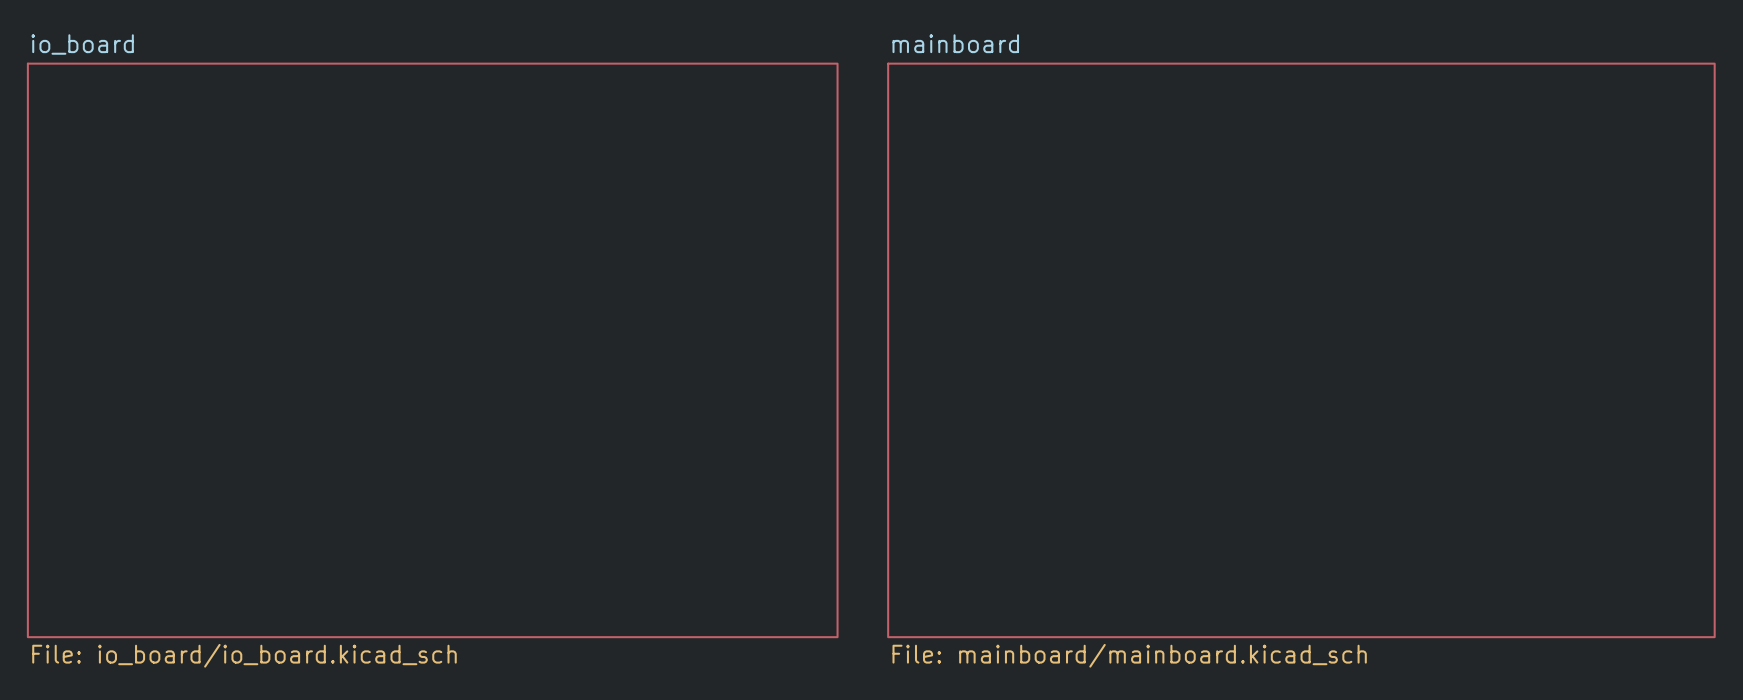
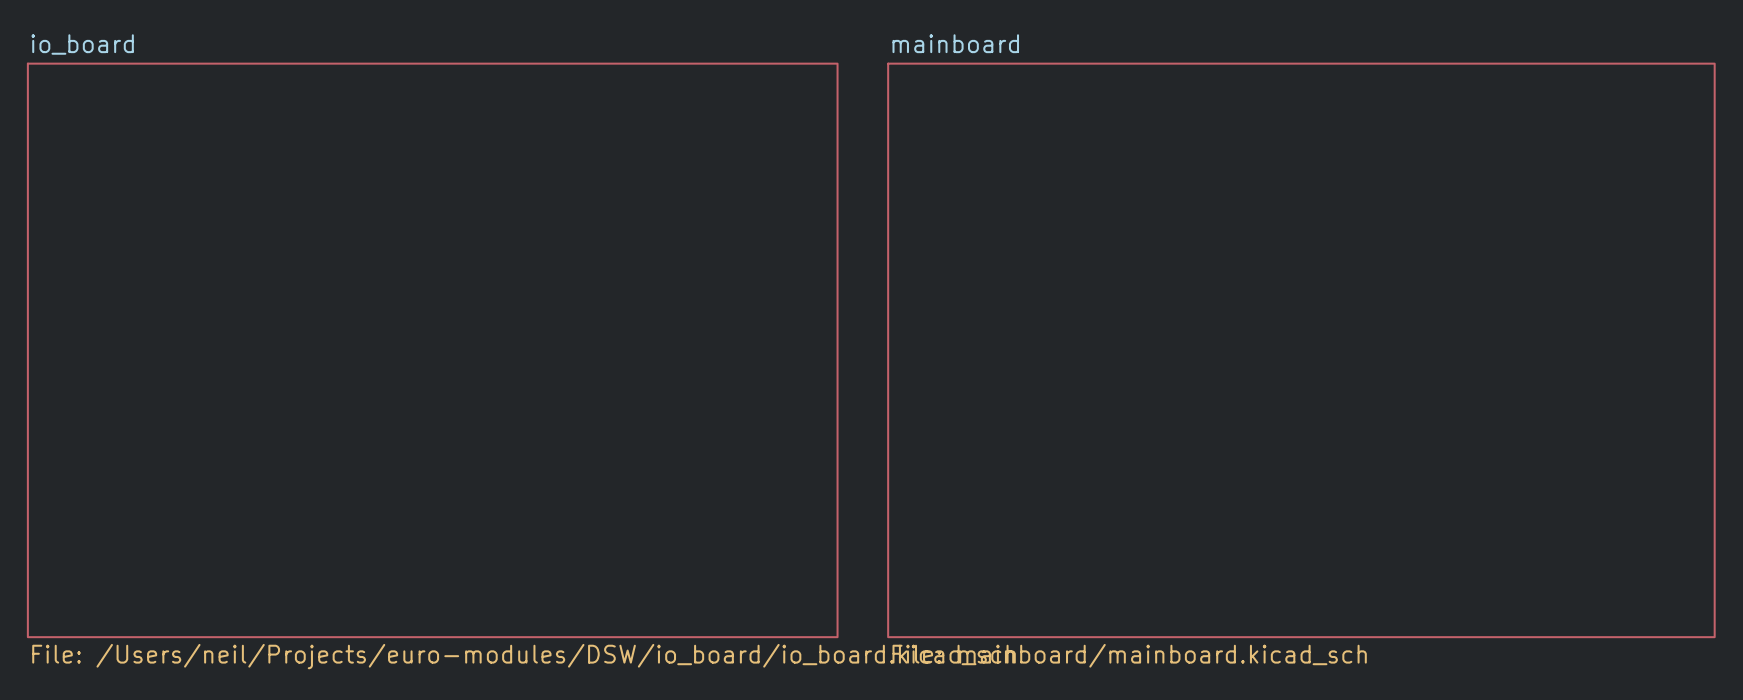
sheet io_board value: File: io_board/io_board.kicad_sch (244, 655) -> File: /Users/neil/Projects/euro-modules/DSW/io_board/io_board.kicad_sch (524, 656)

